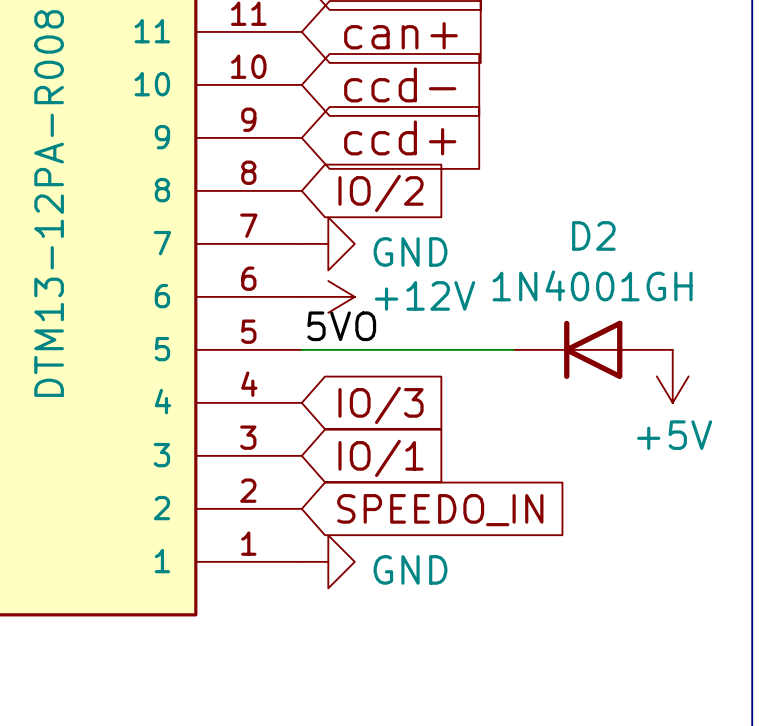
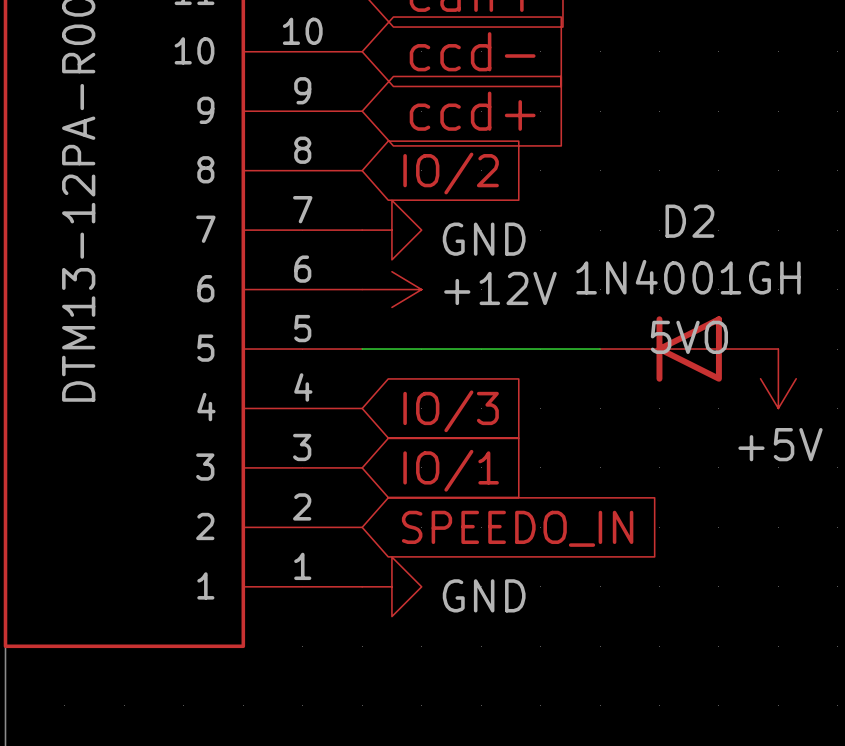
label position: 5VO (341, 326) -> 5VO (689, 337)

